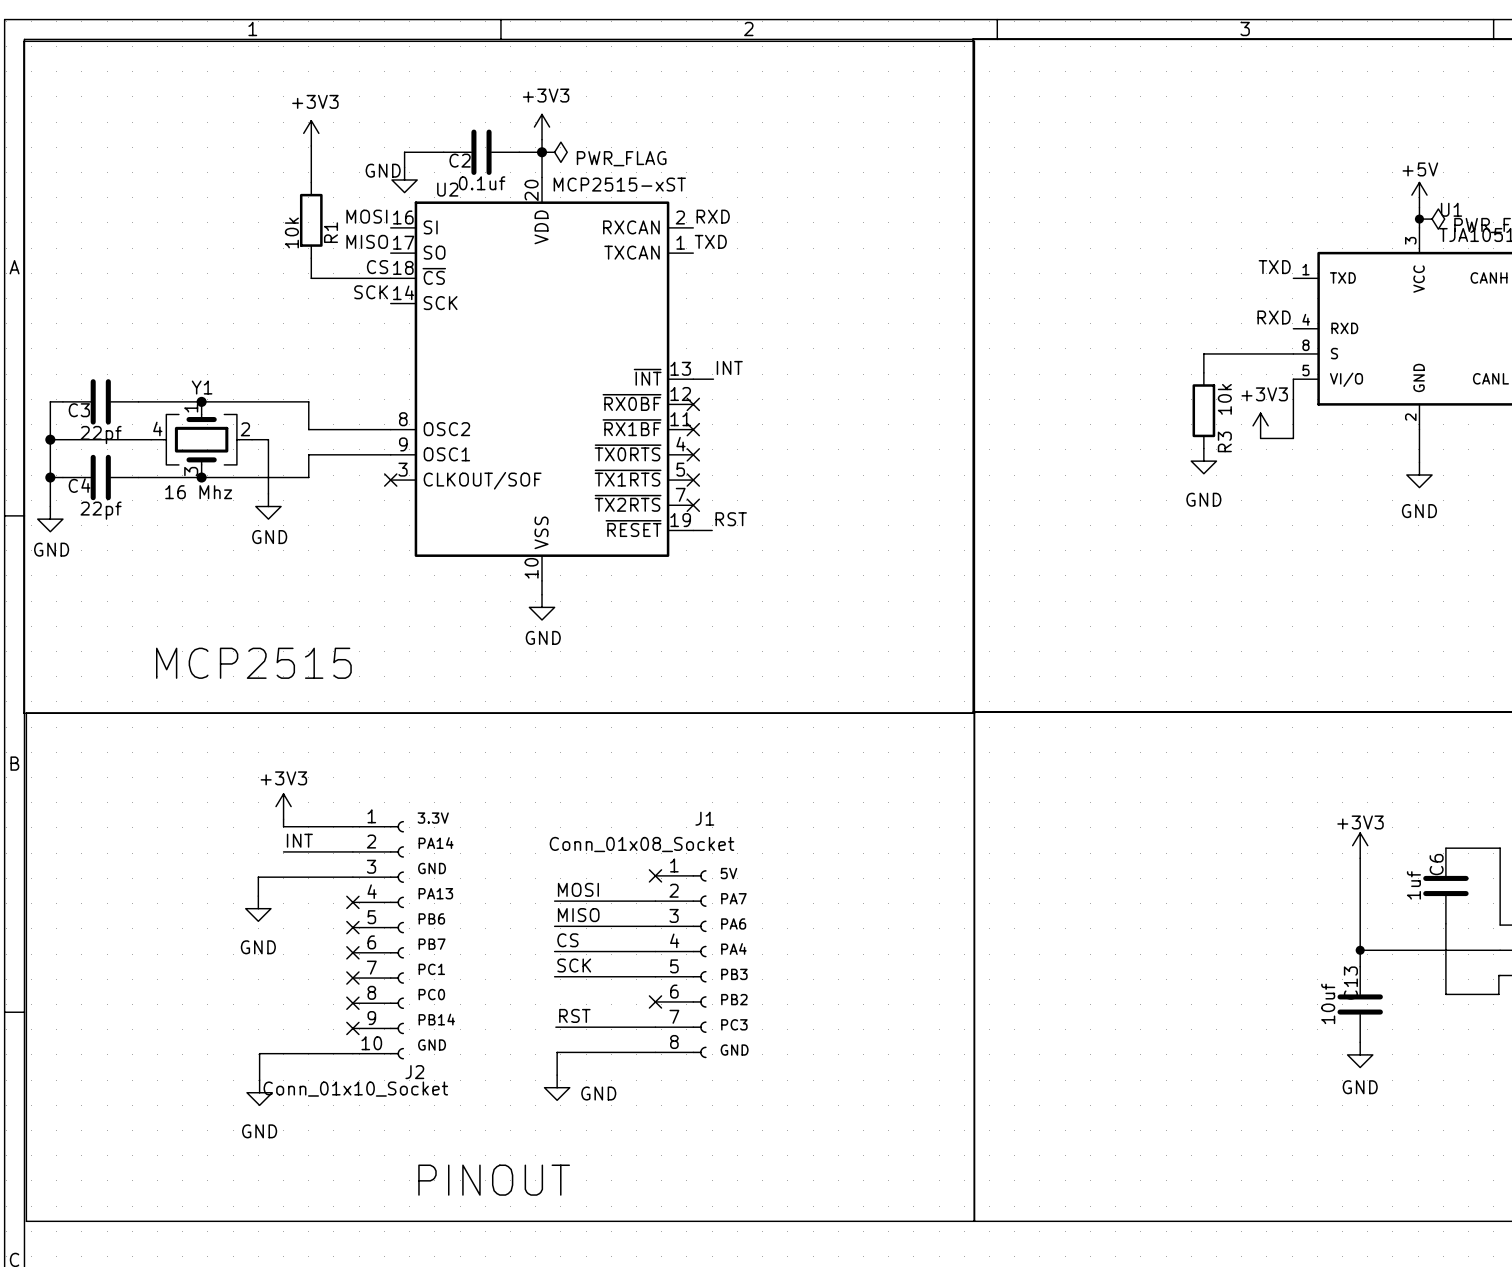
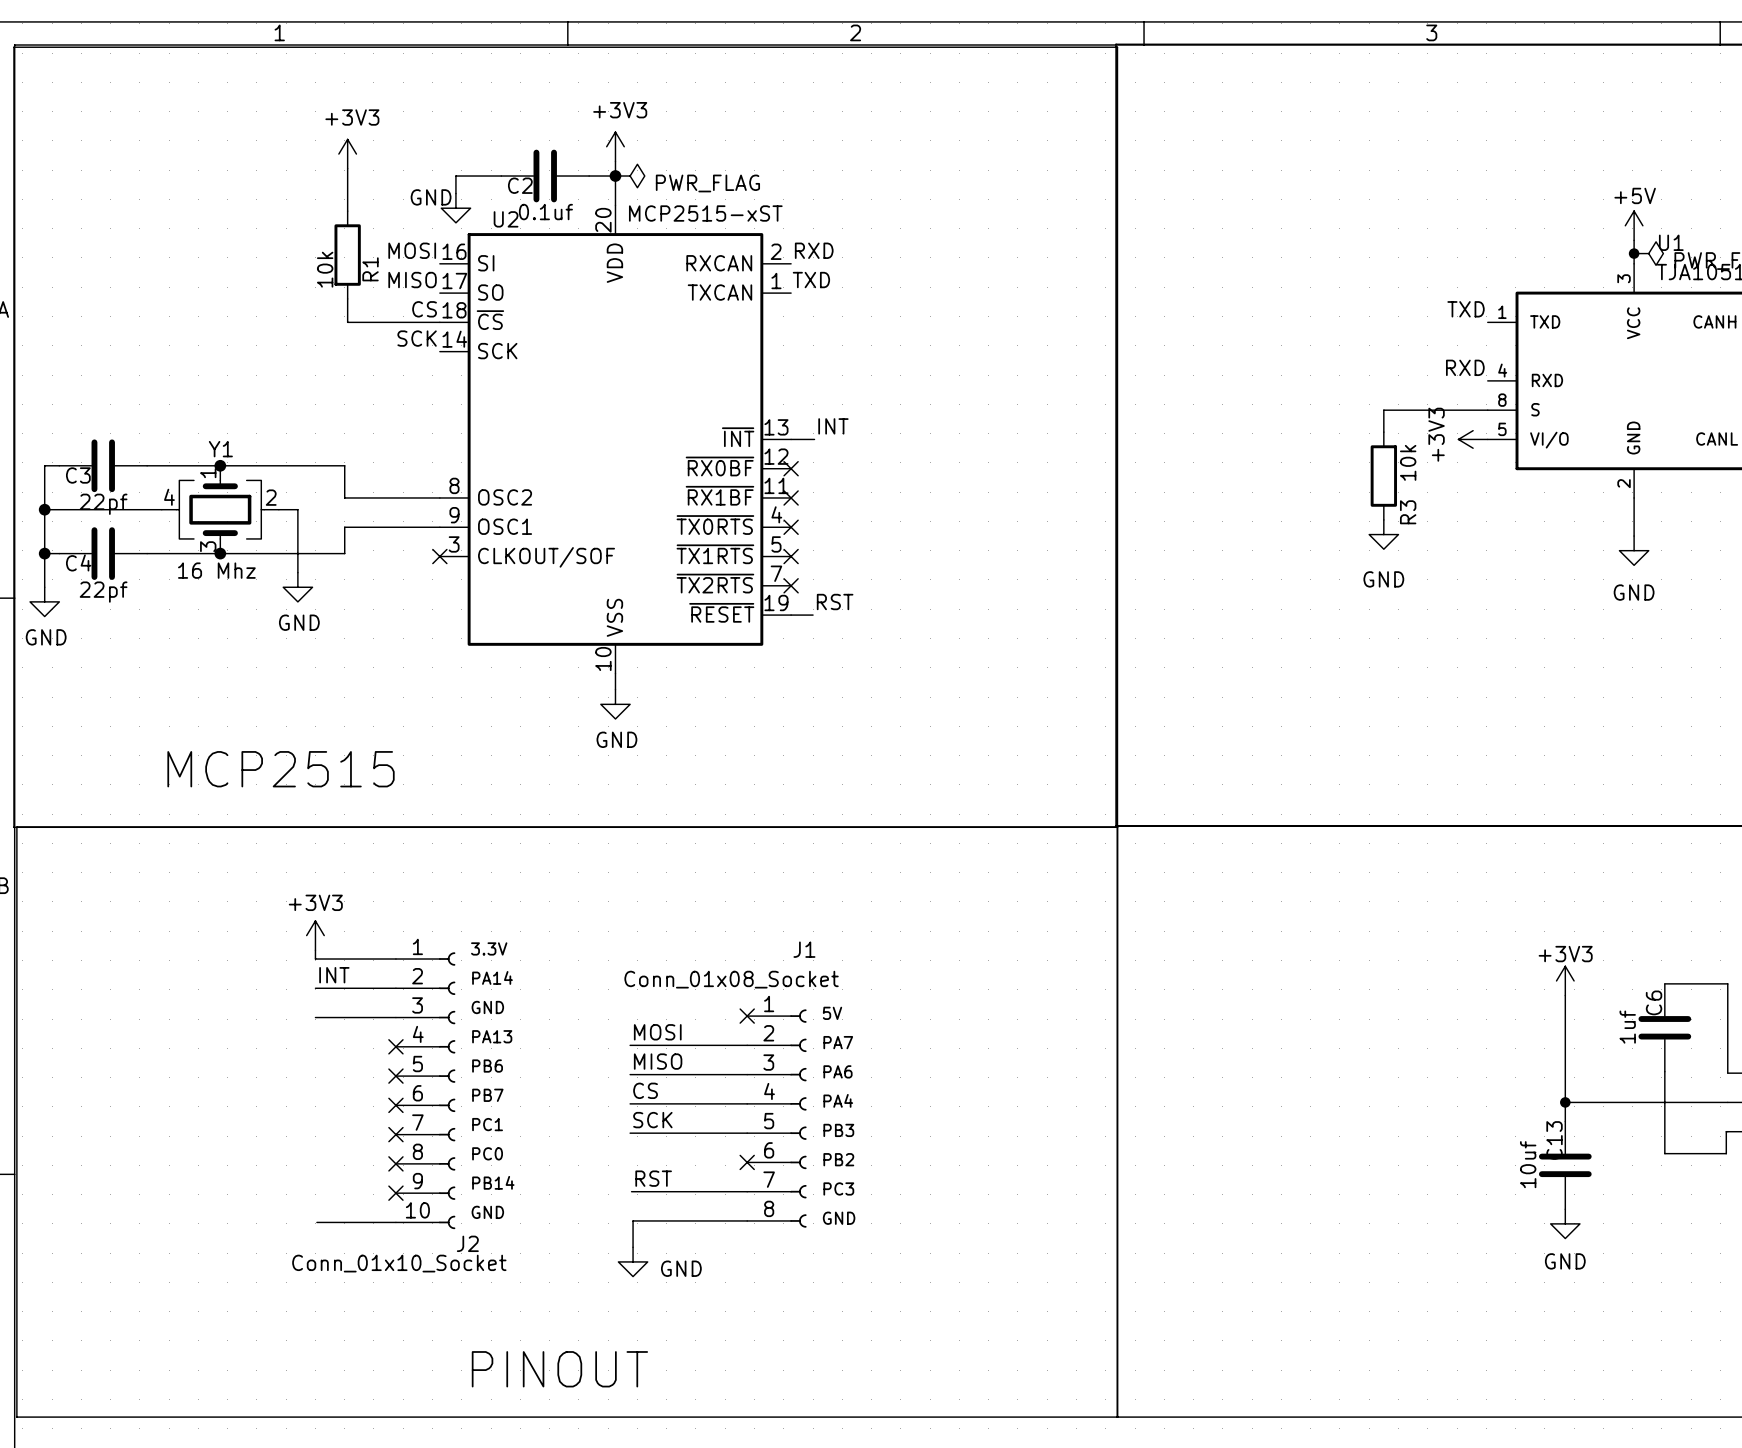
wire: (1293, 379) (1293, 438) (1260, 438) -> none
power symbol rotation: 0° (1260, 425) -> 90° counterclockwise (1473, 439)
power symbol position: +3V3 (1260, 425) -> +3V3 (1473, 439)
wire: (283, 877) (258, 877) (258, 896) -> none
power symbol: GND (258, 908) -> none
wire: (284, 1053) (259, 1053) (259, 1080) -> none
power symbol: GND (259, 1092) -> none

